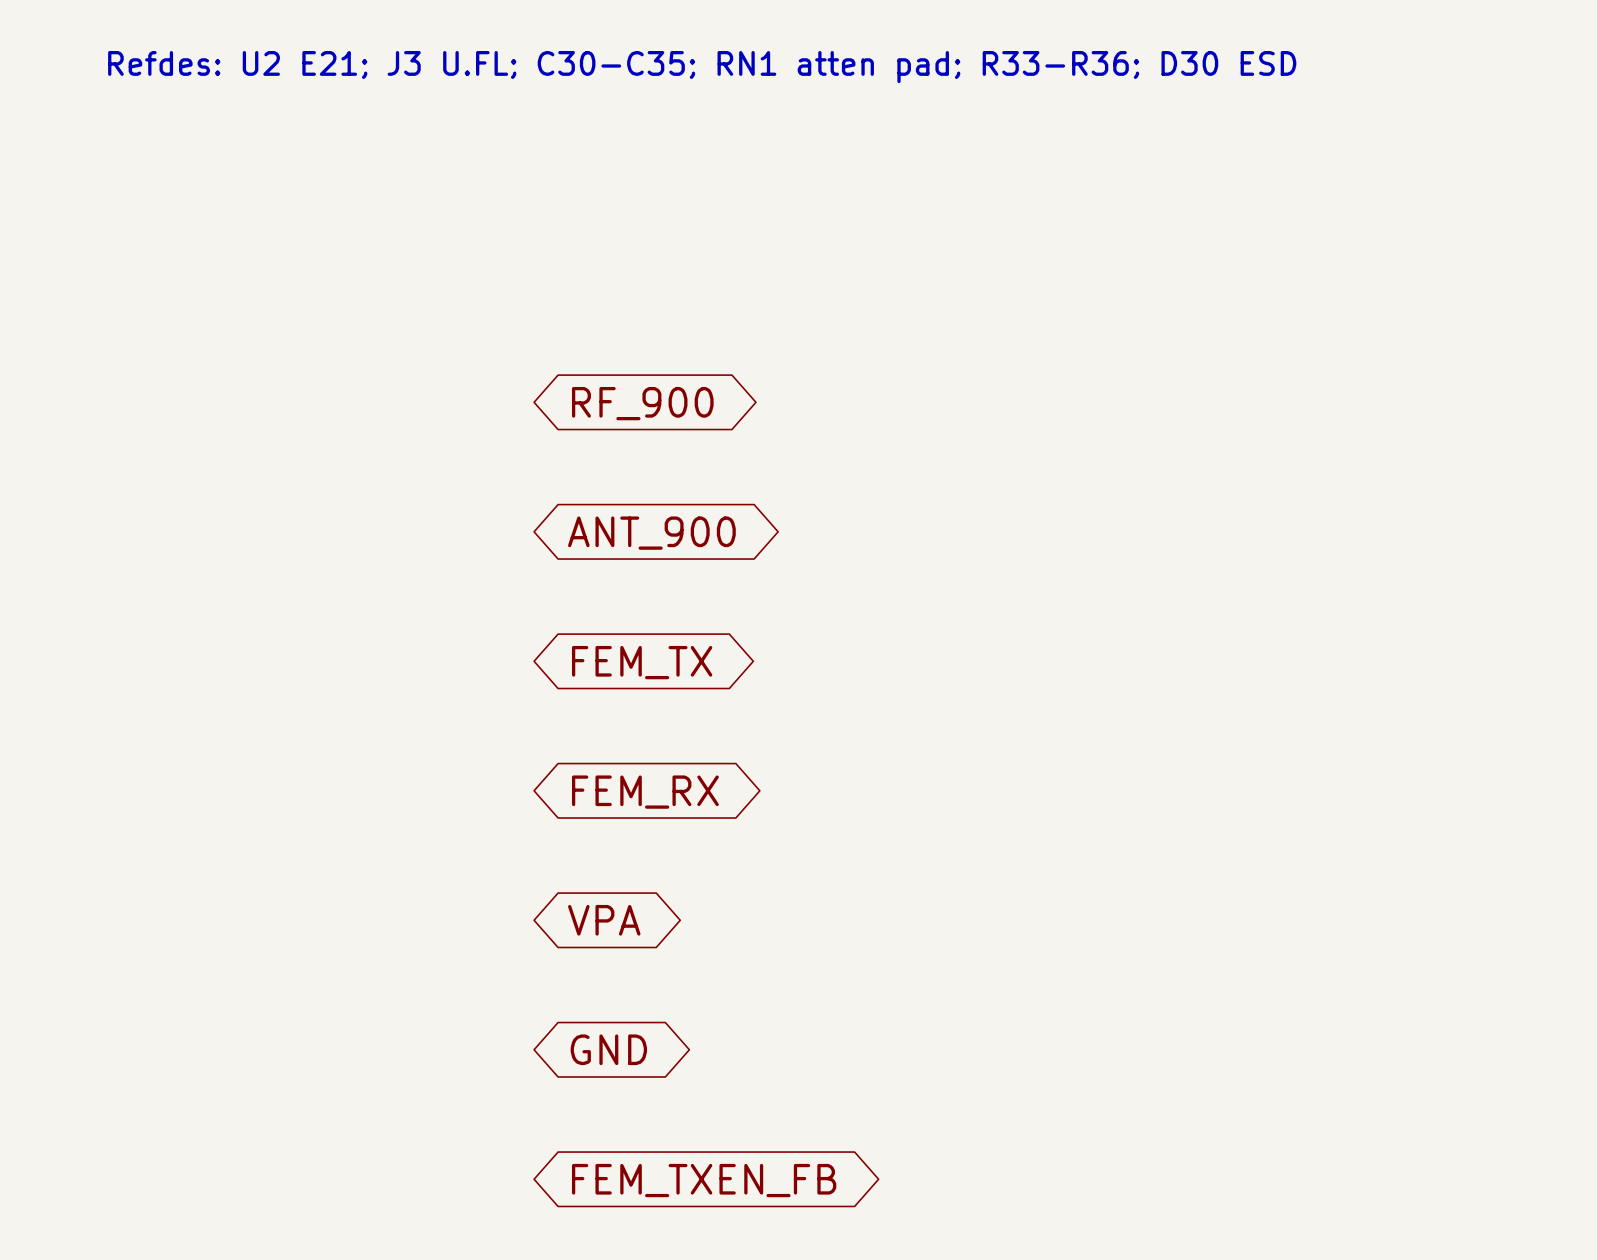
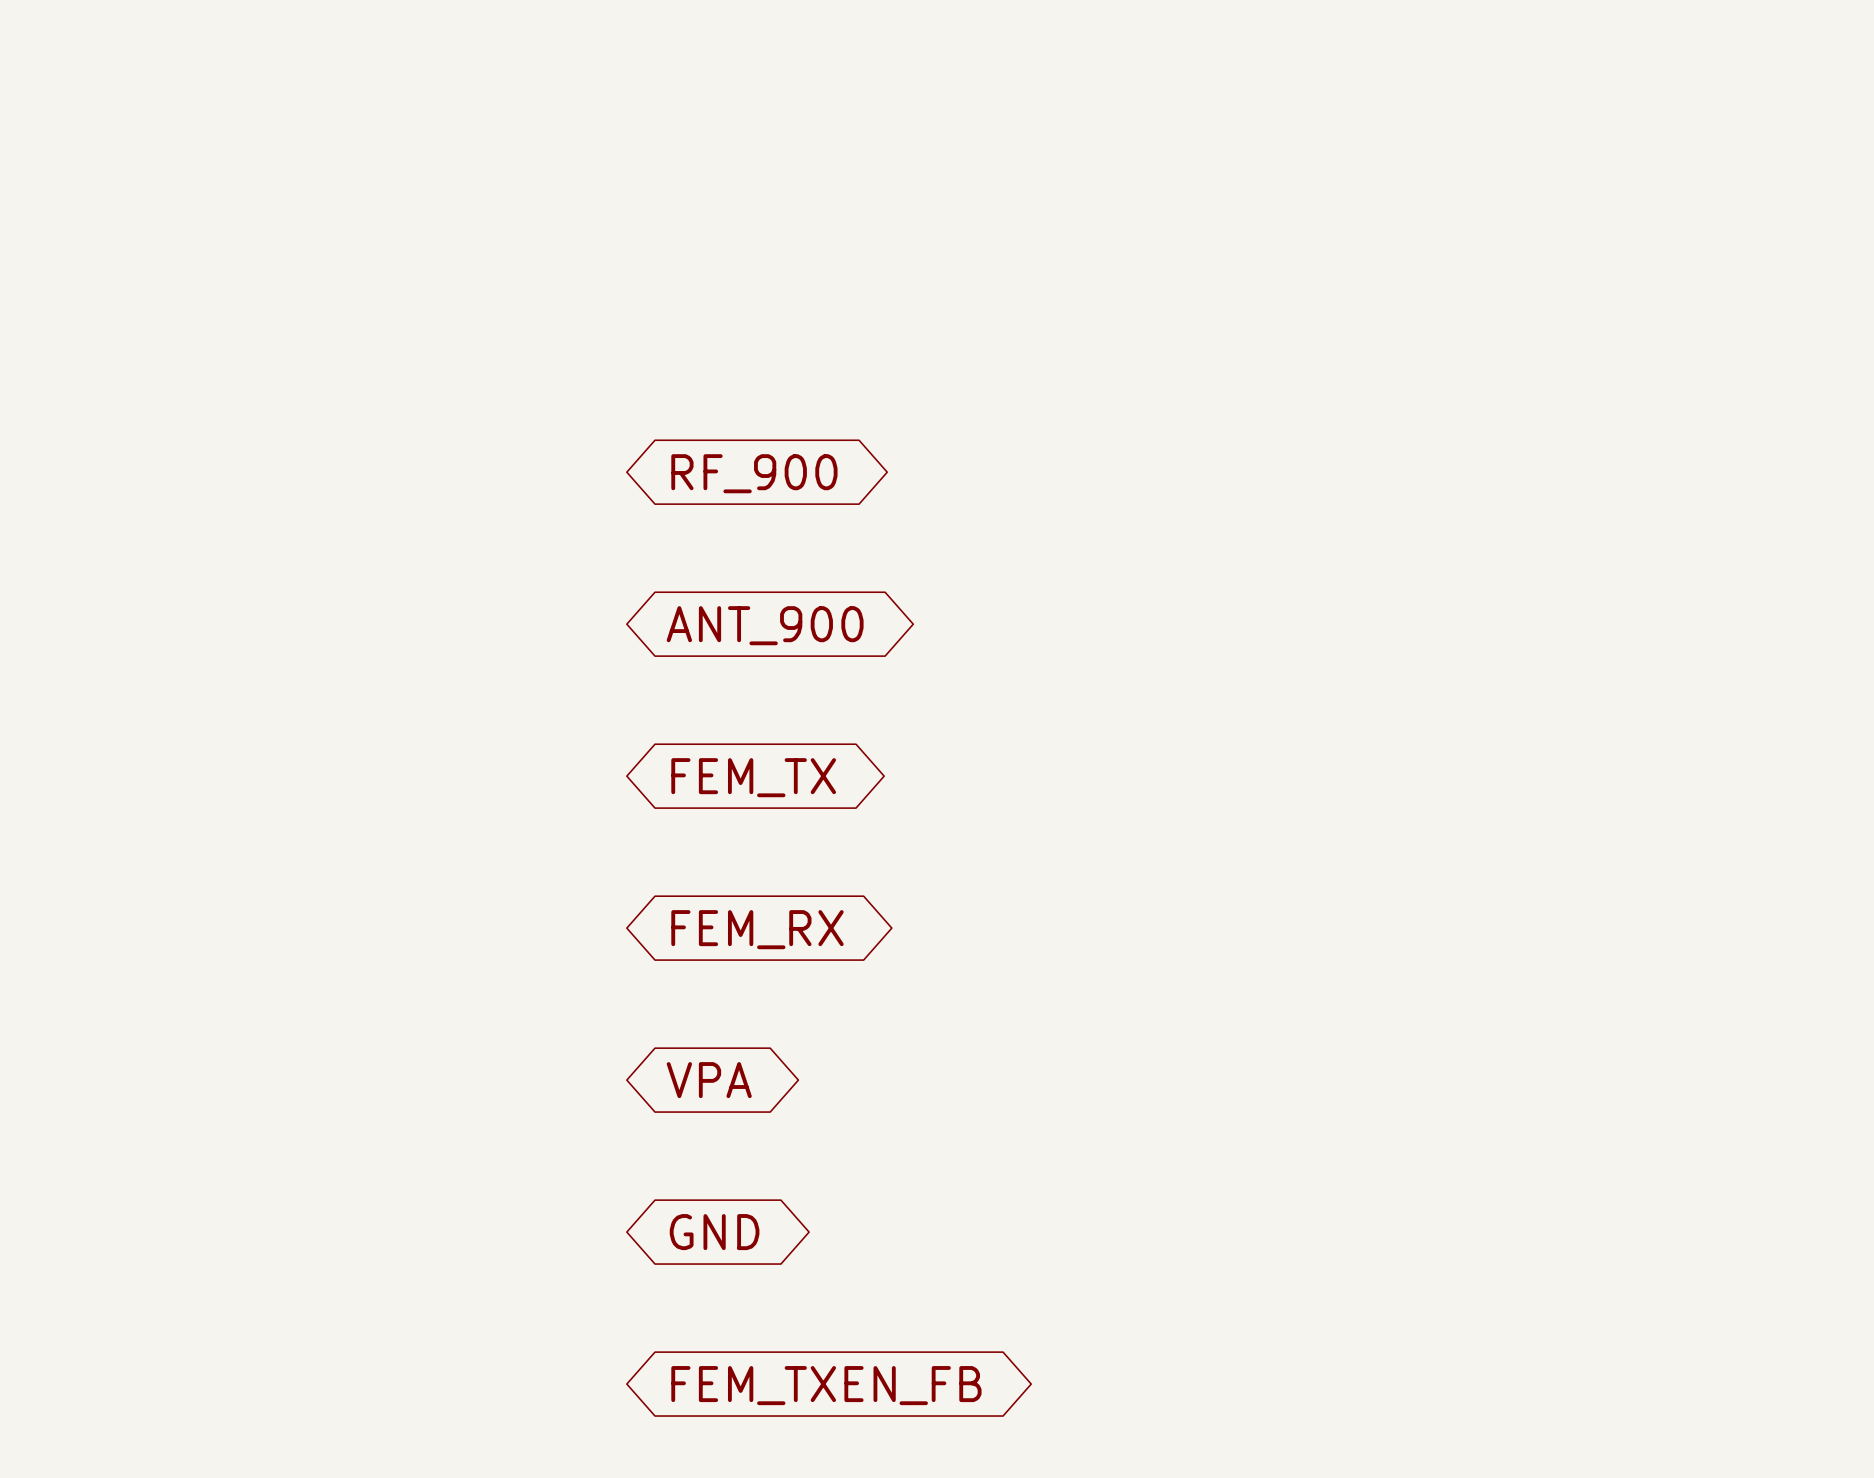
text: Refdes: U2 E21; J3 U.FL; C30-C35; RN1 atten pad; R33-R36; D30 ESD (702, 67) -> none

